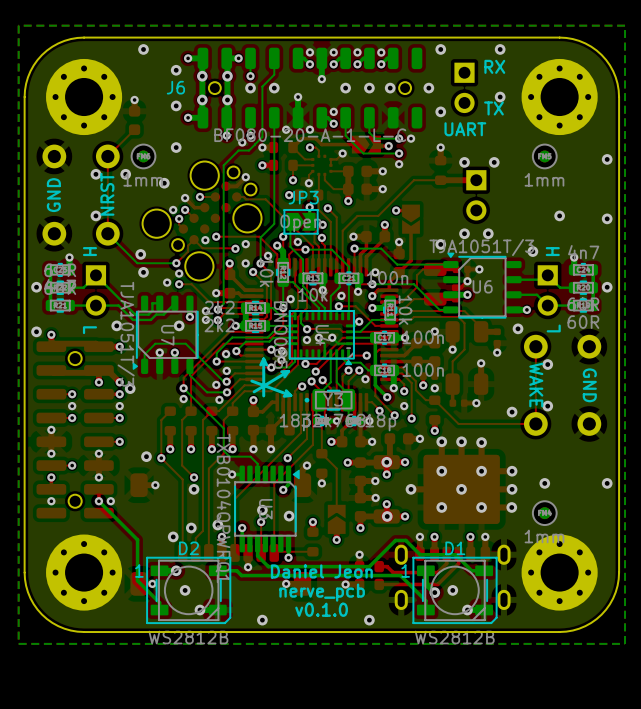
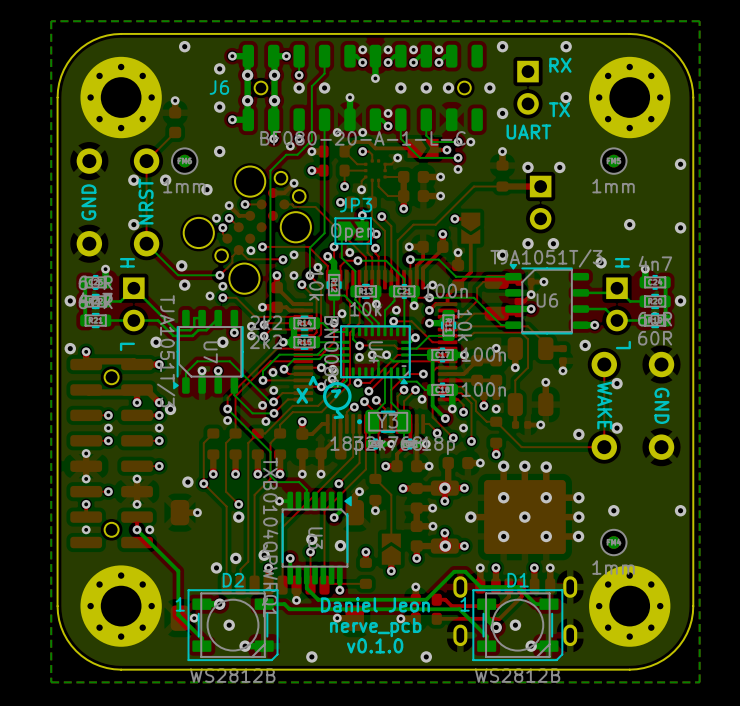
line: (263, 359) (263, 395) -> none
drawing: none -> [322, 382, 352, 411]
line: (288, 371) (254, 391) -> none
text: none -> X (302, 395)
line: (251, 381) (290, 395) -> none

